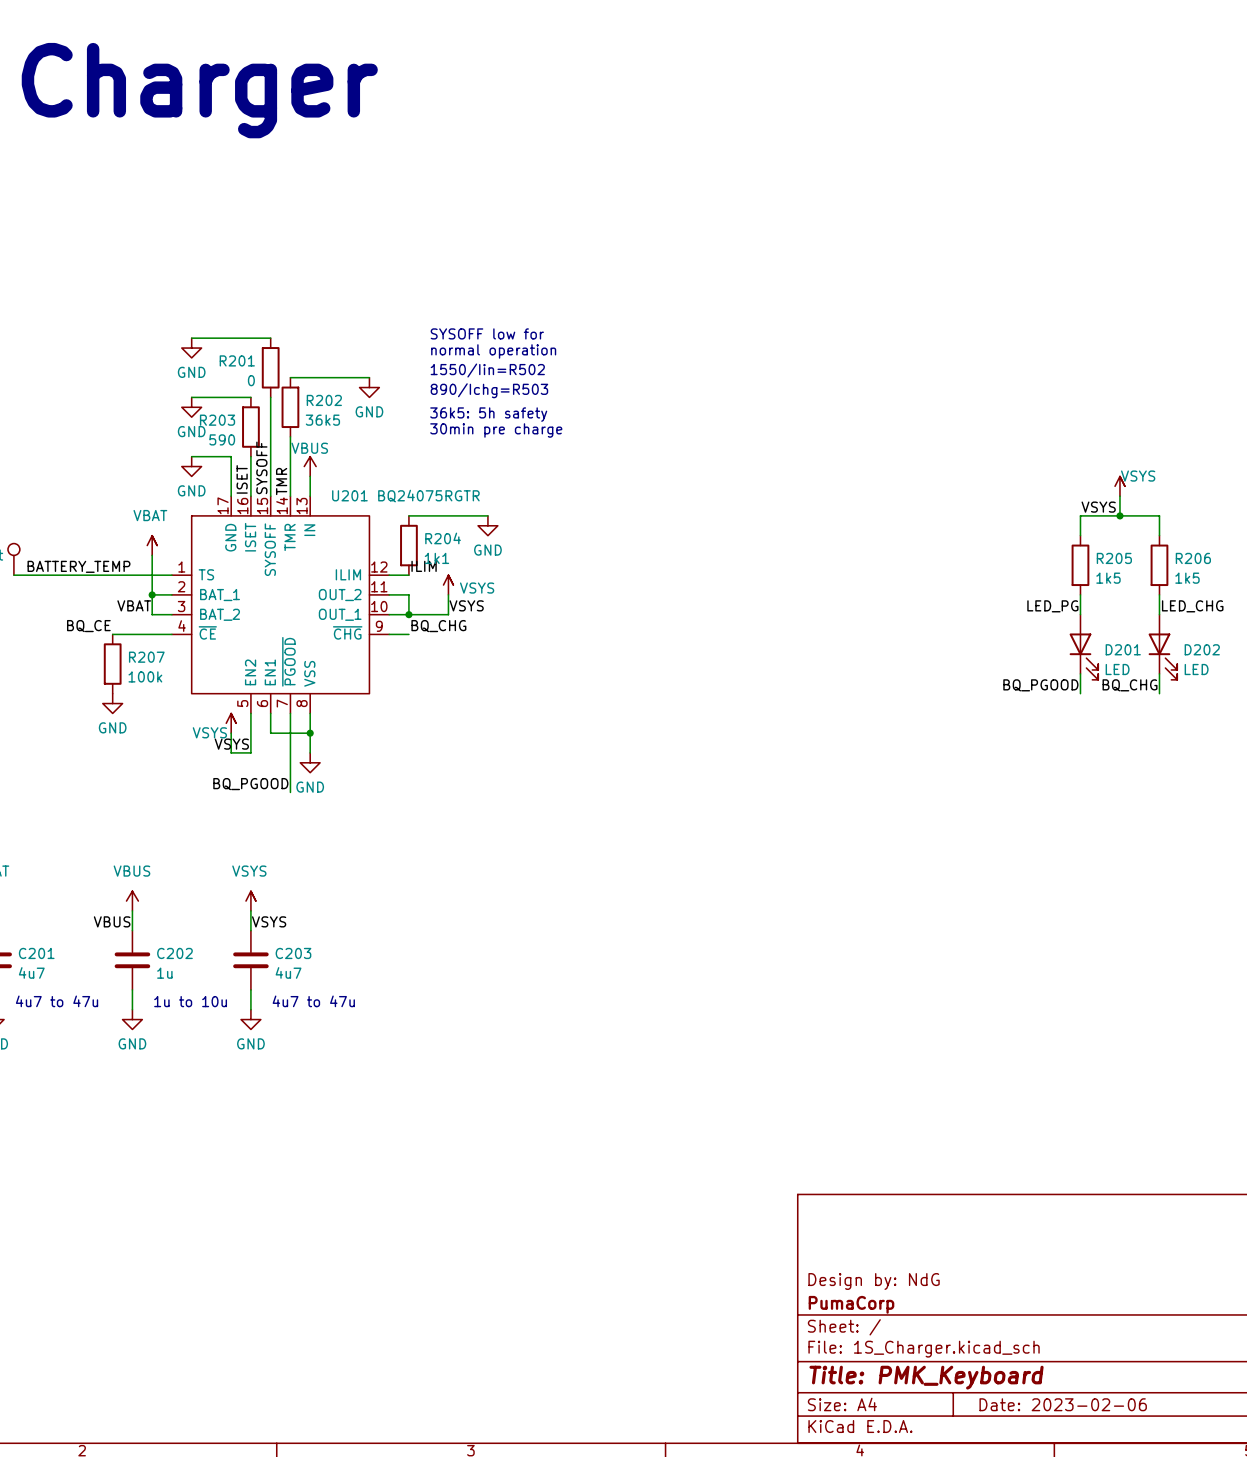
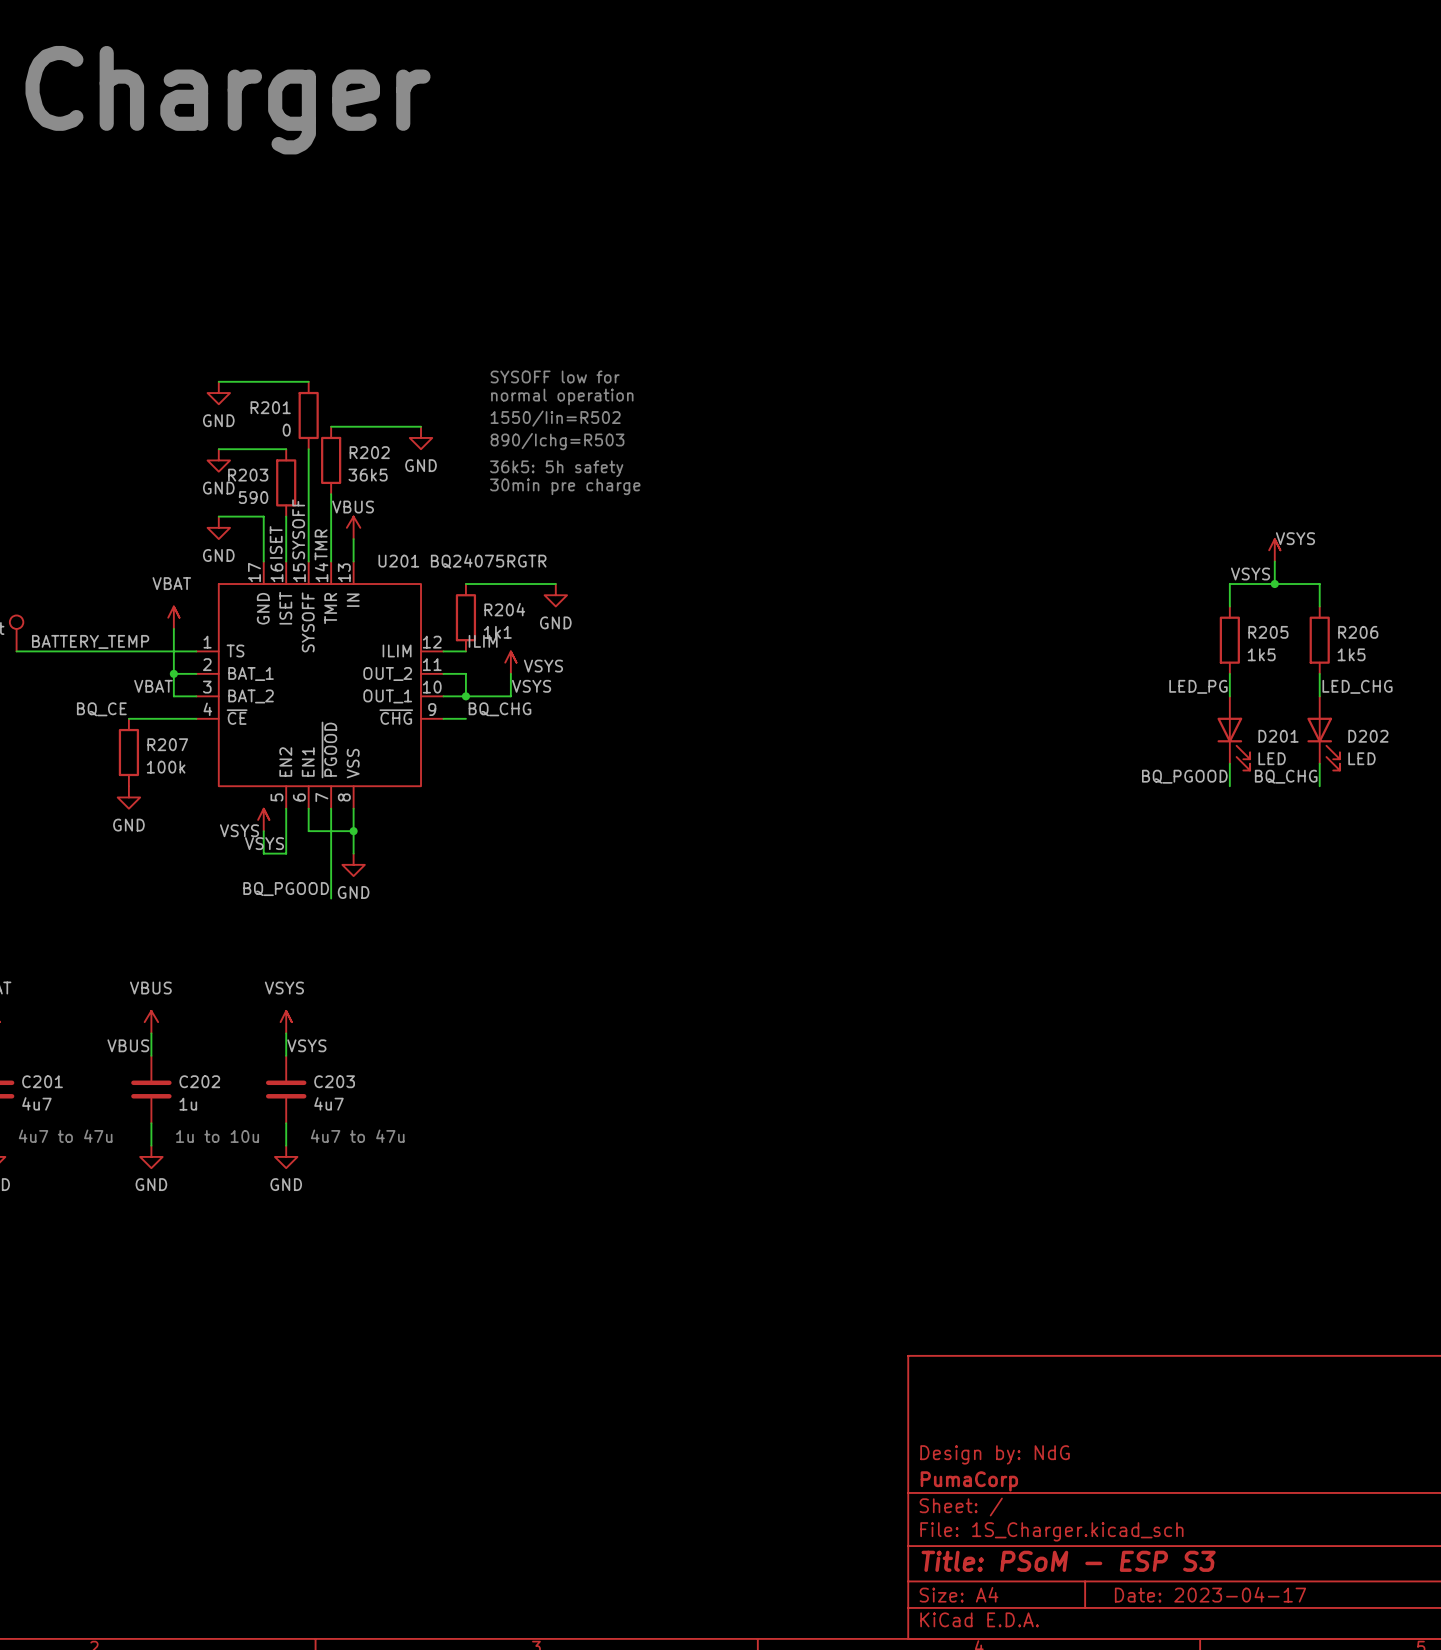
title block: Title: PMK_Keyboard (926, 1377) -> Title: PSoM - ESP S3 (1068, 1561)
title block: Date: 2023-02-06 (1063, 1404) -> Date: 2023-04-17 (1210, 1594)

